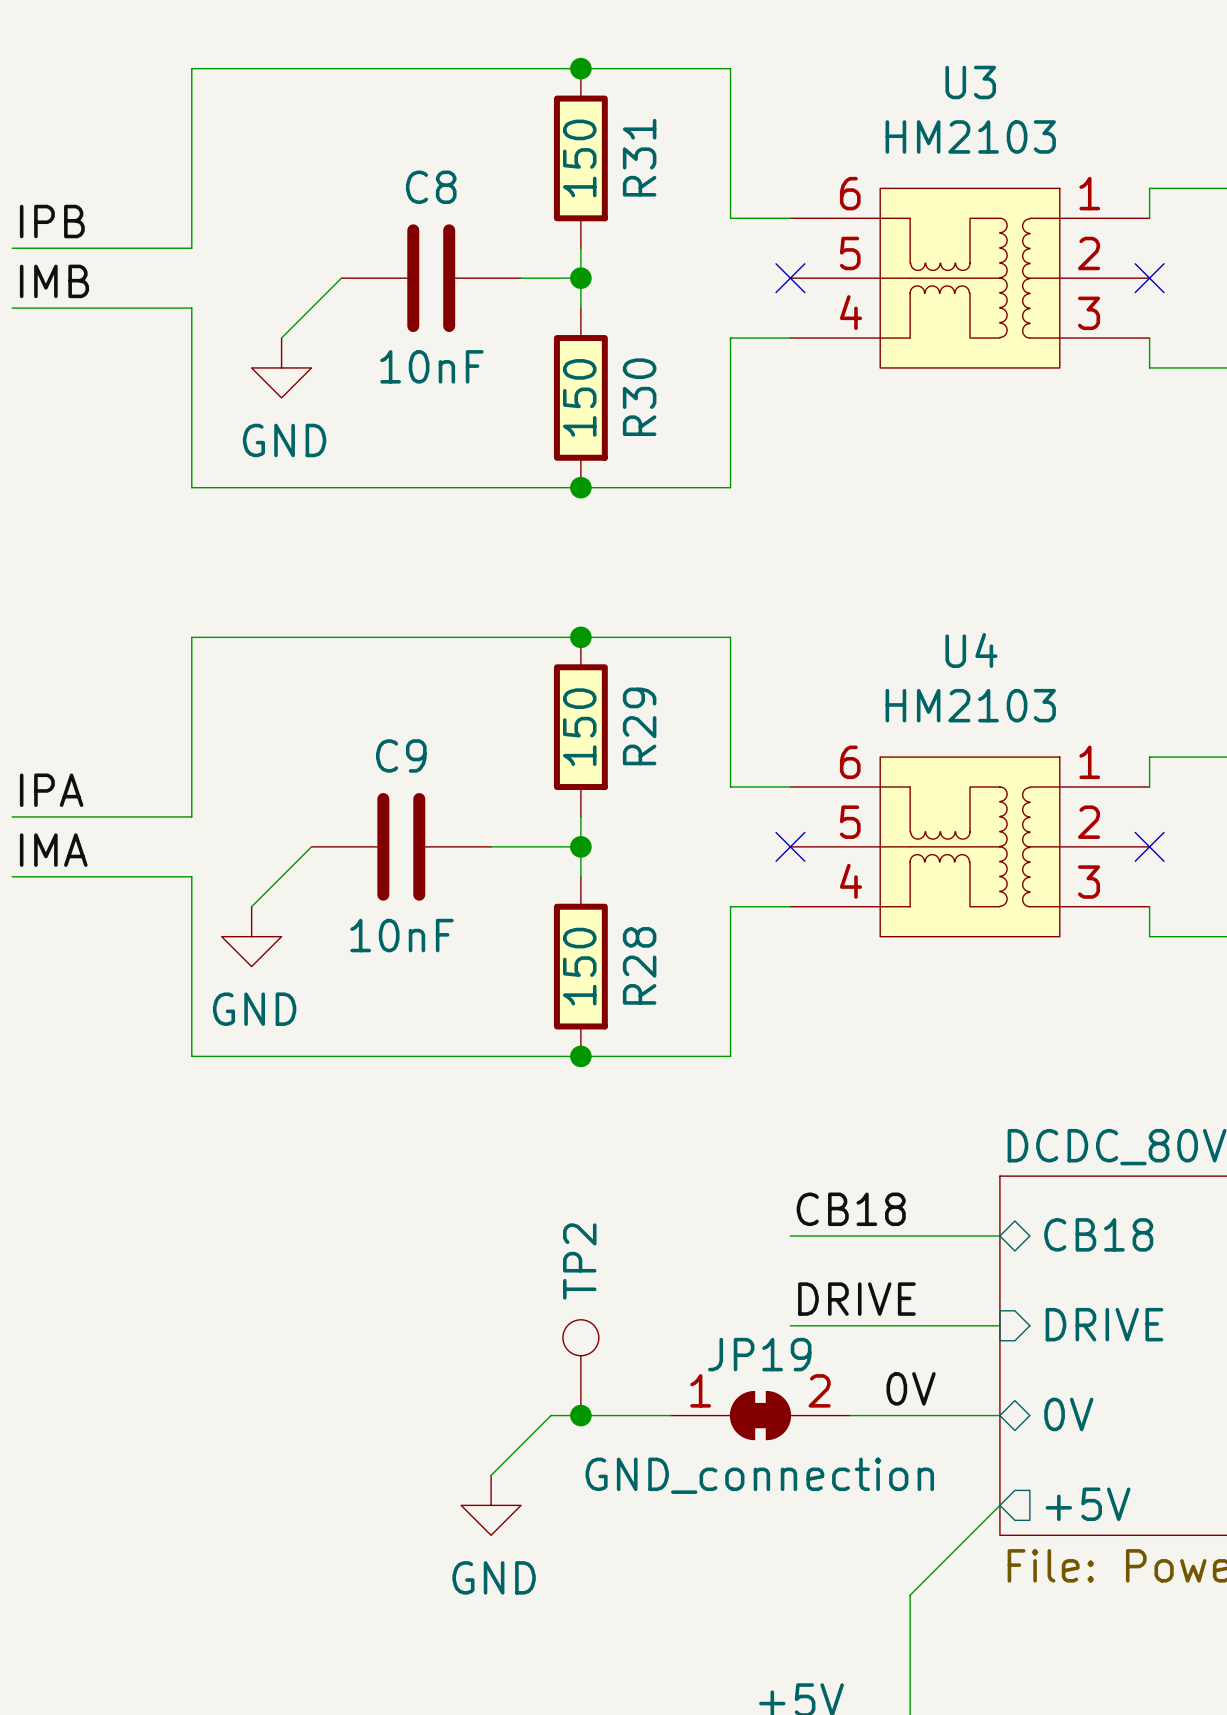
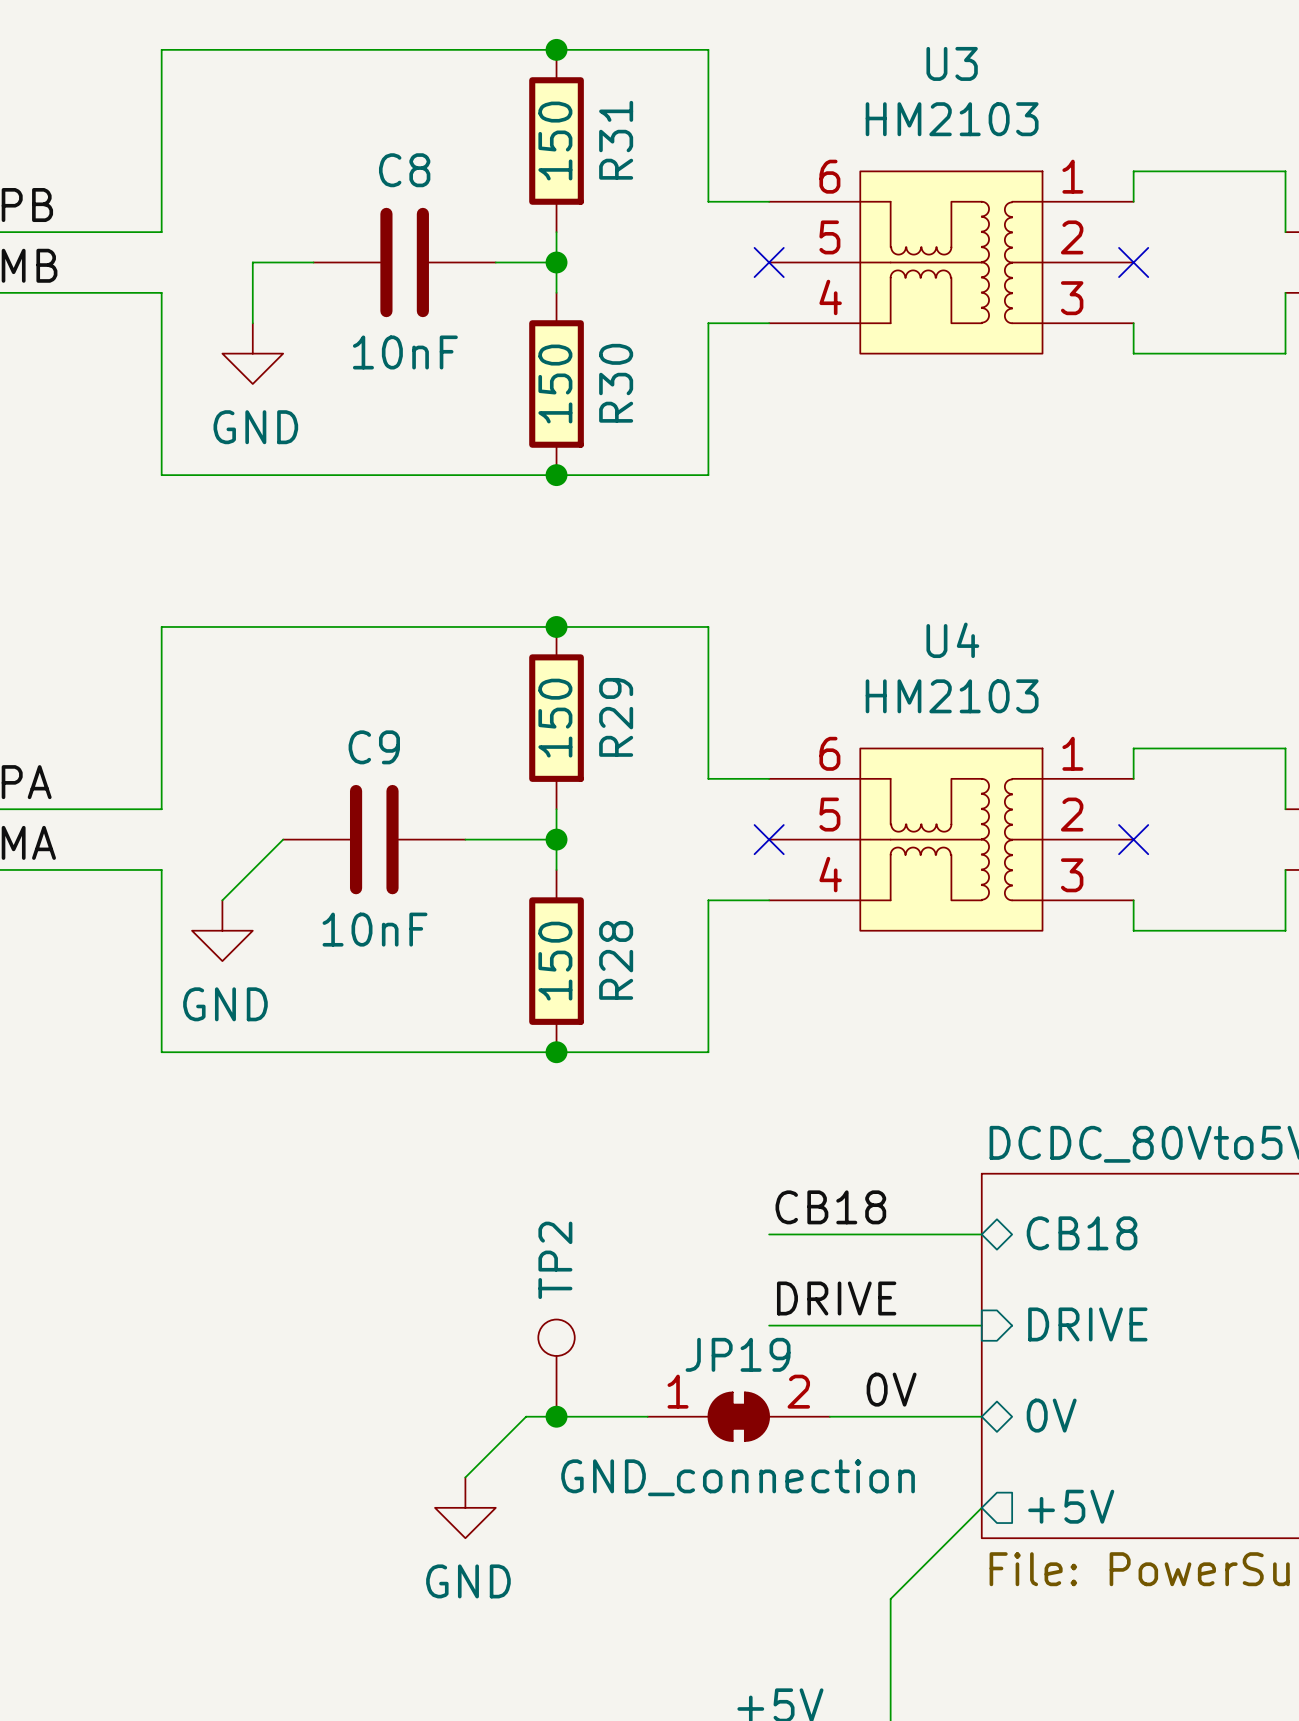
wire: (341, 278) (281, 338) -> (313, 262) (252, 262) (252, 323)

